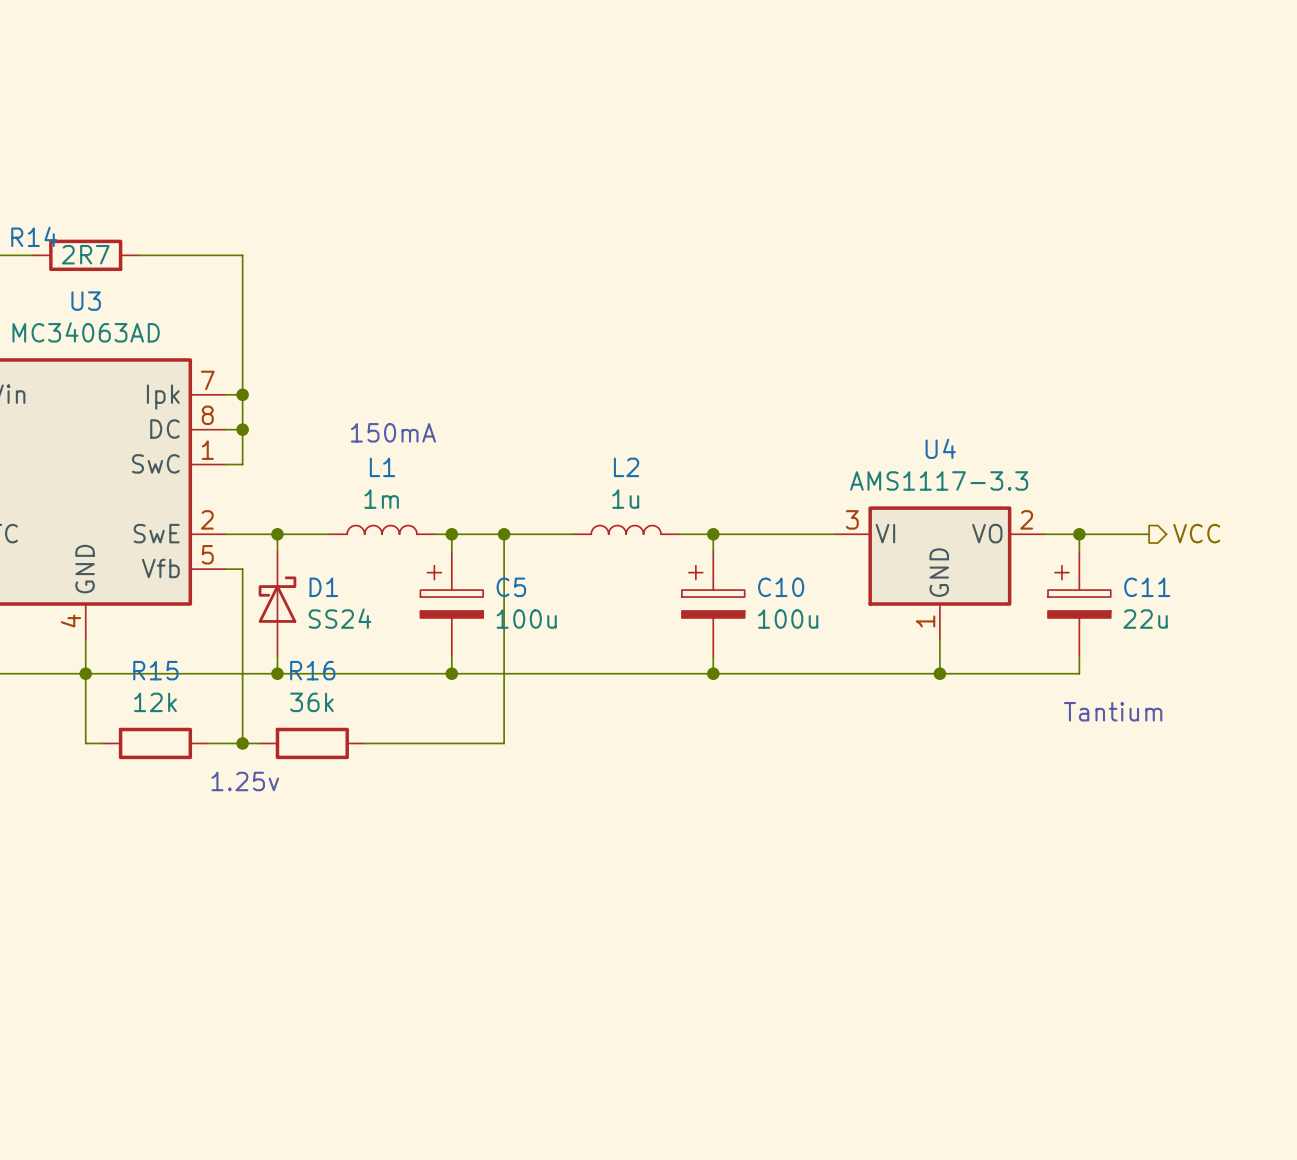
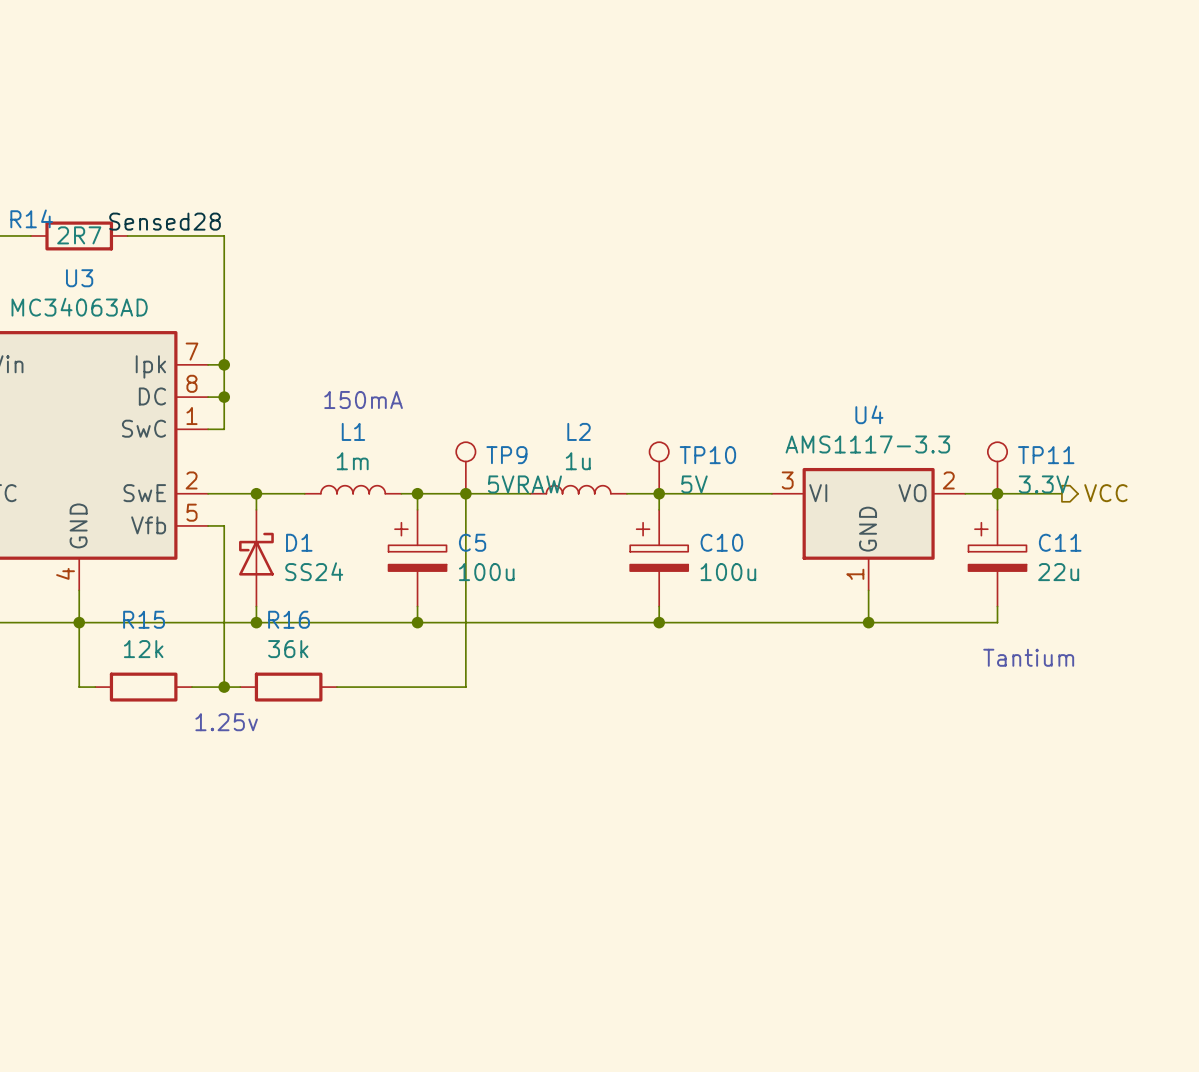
label: none -> Sensed28 (165, 221)
TP9: none -> 5VRAW (465, 467)
TP10: none -> 5V (659, 467)
TP11: none -> 3.3V (997, 467)

